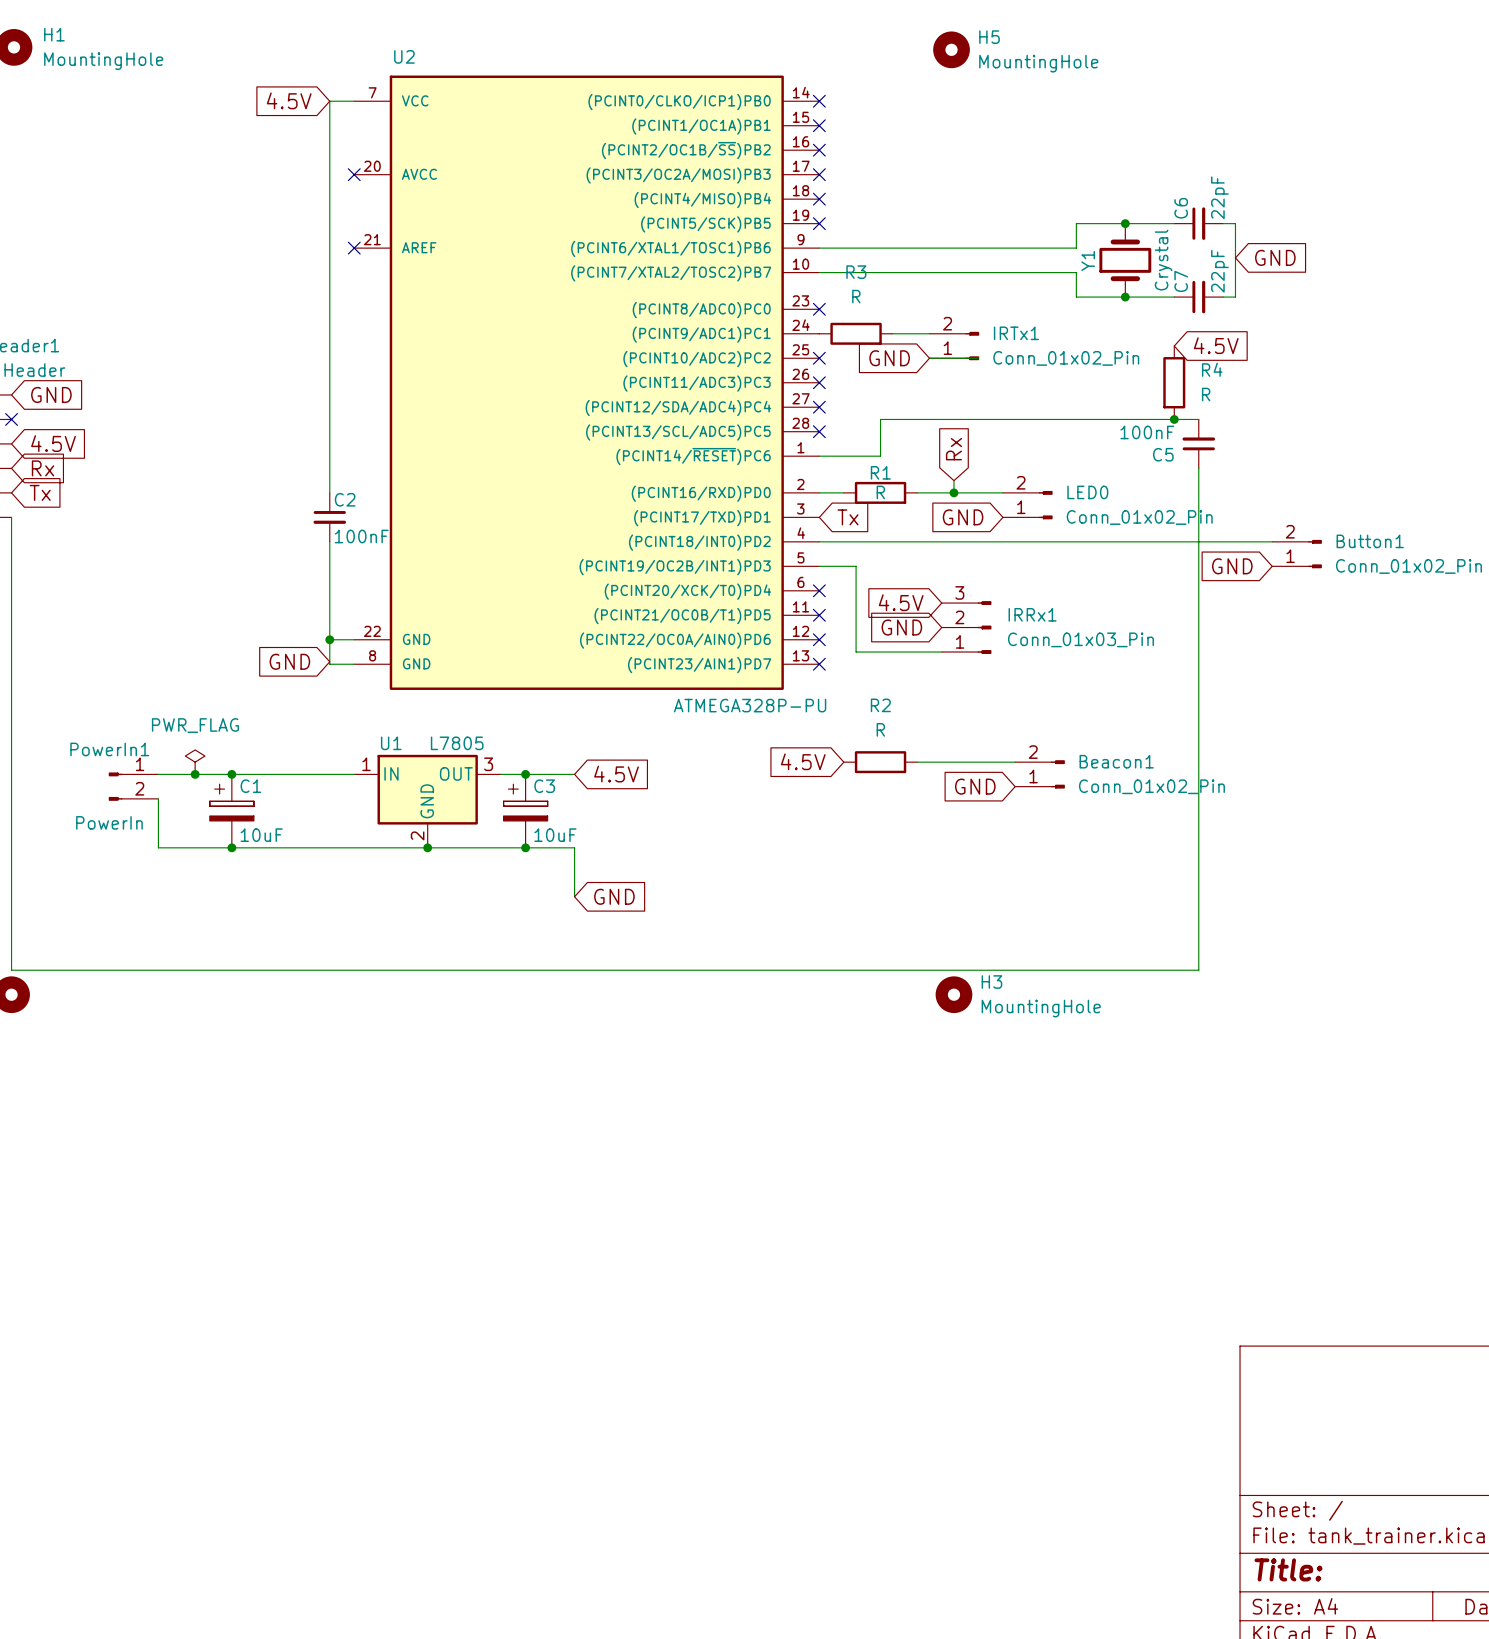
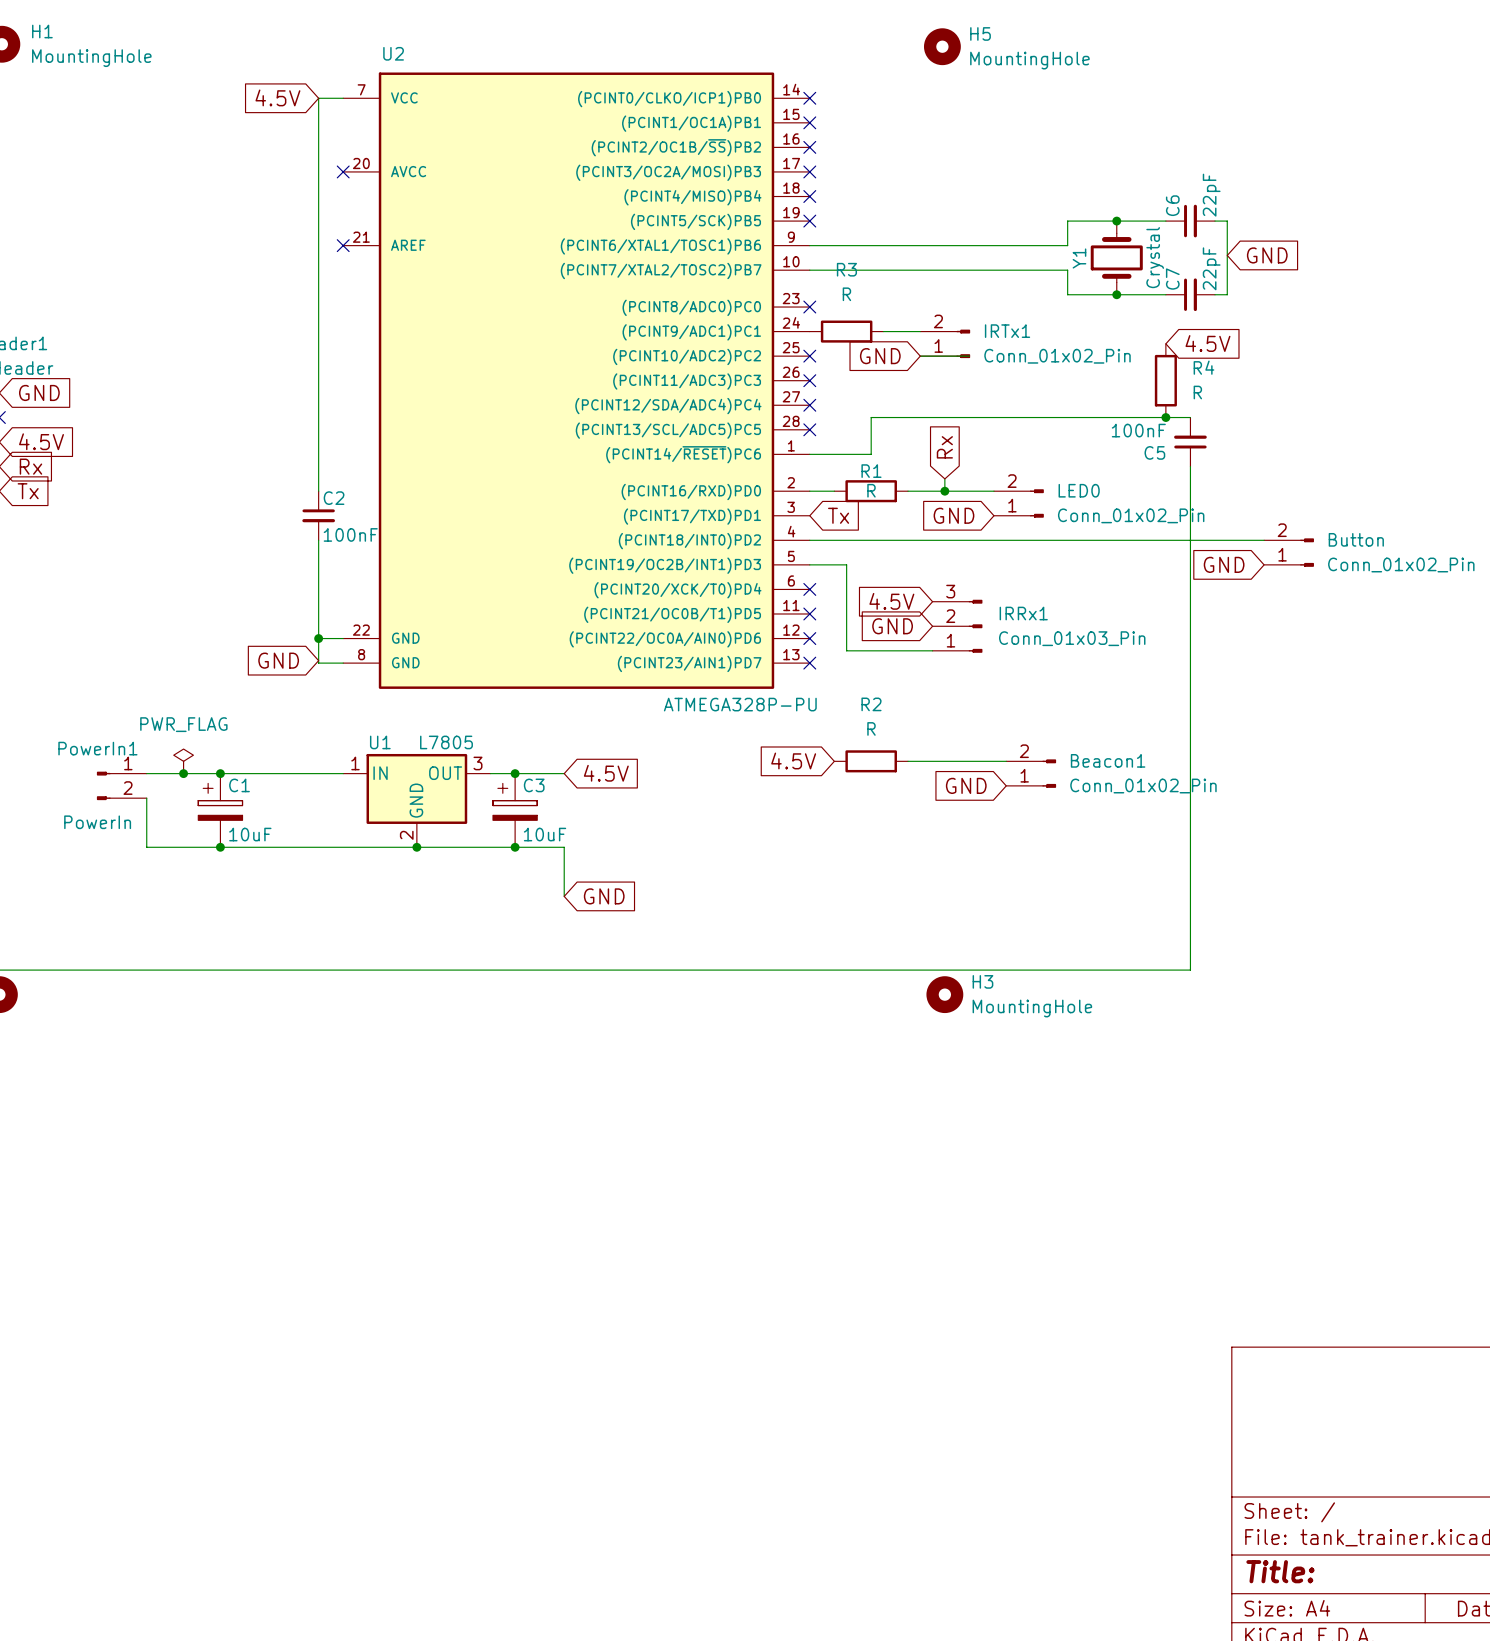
Button1 name: Button1 (1370, 541) -> Button (1356, 539)

